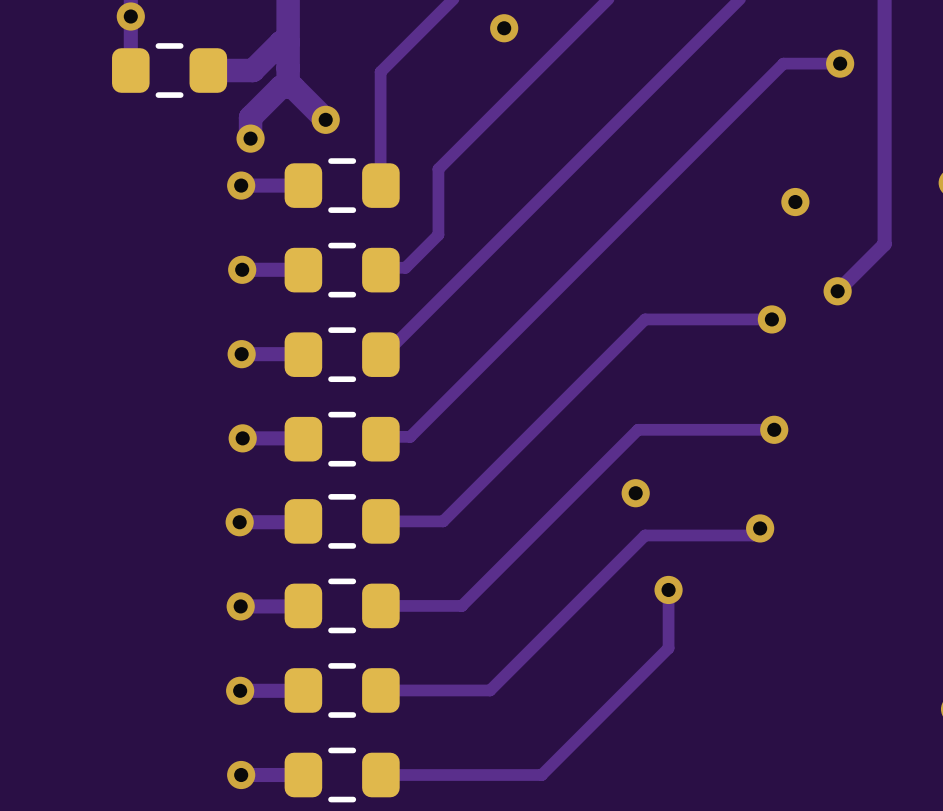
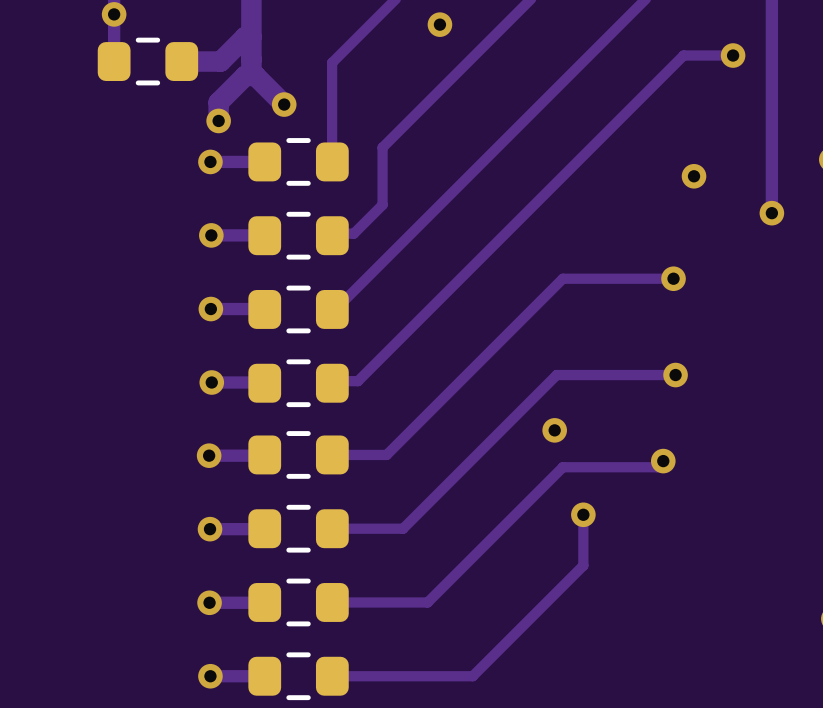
track: (884, 244) (837, 291) -> none
via position: (837, 291) -> (771, 213)

